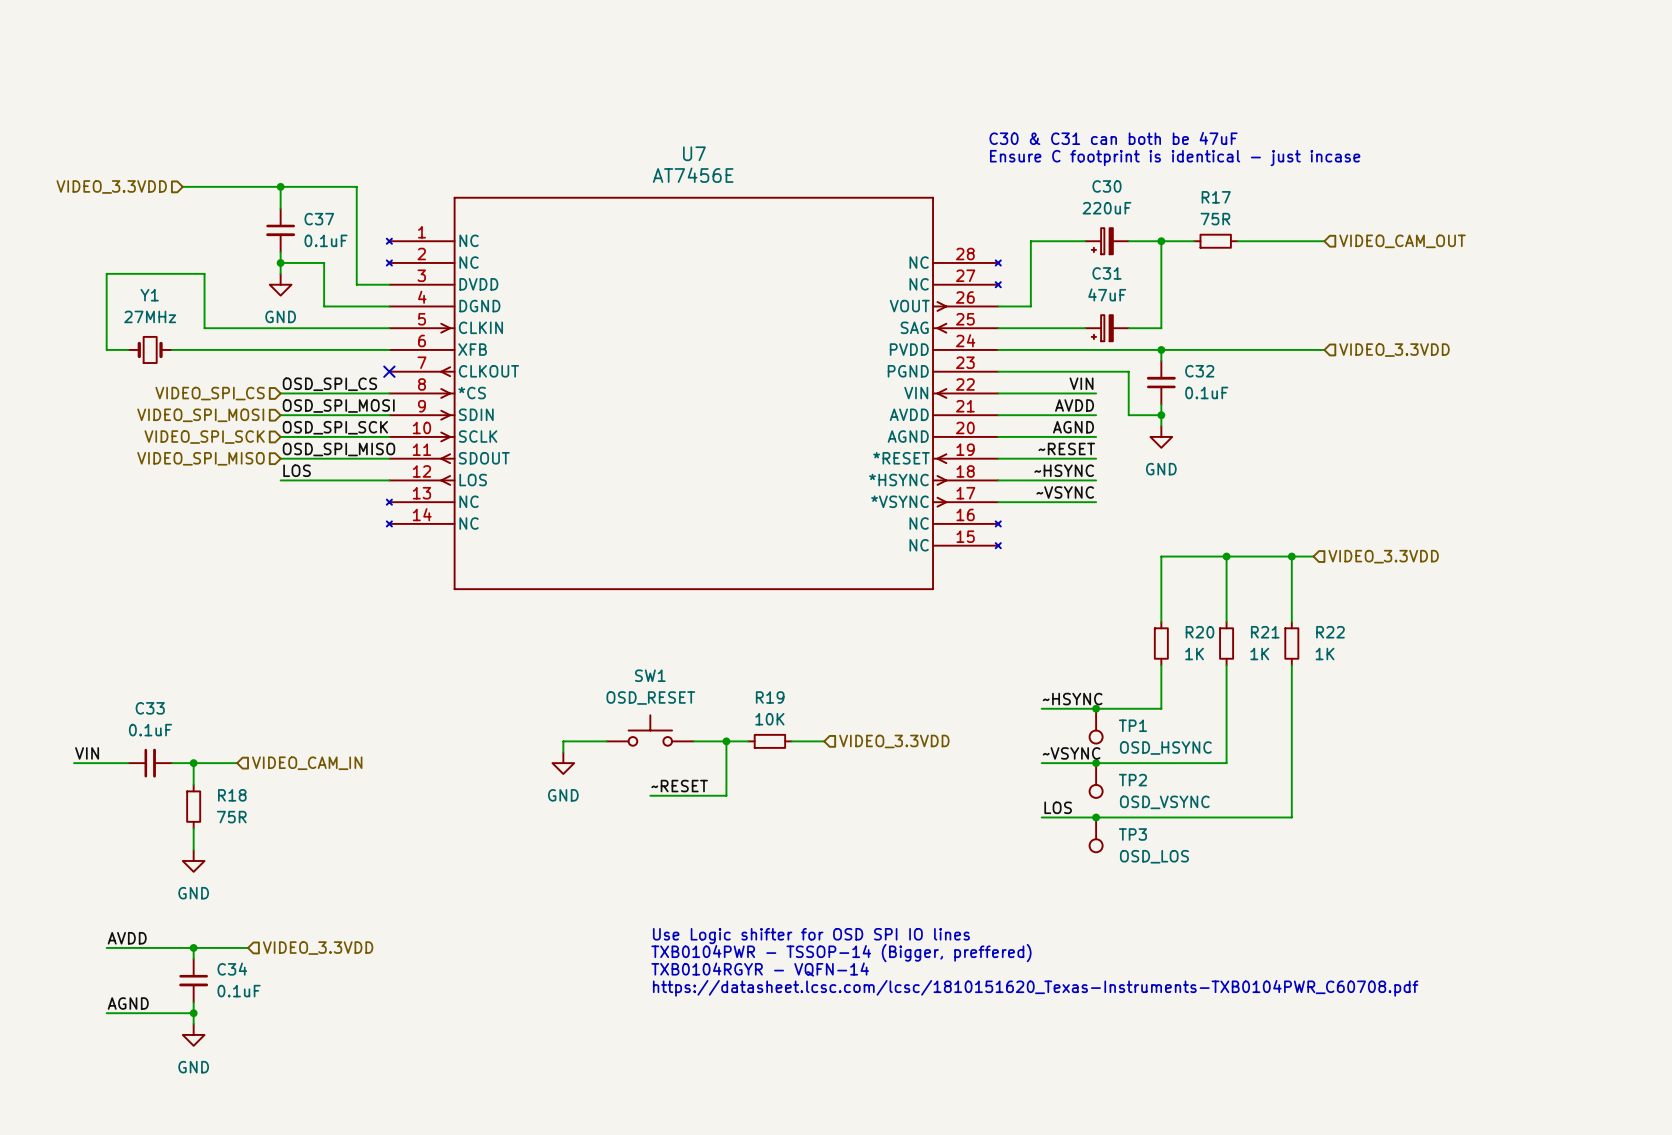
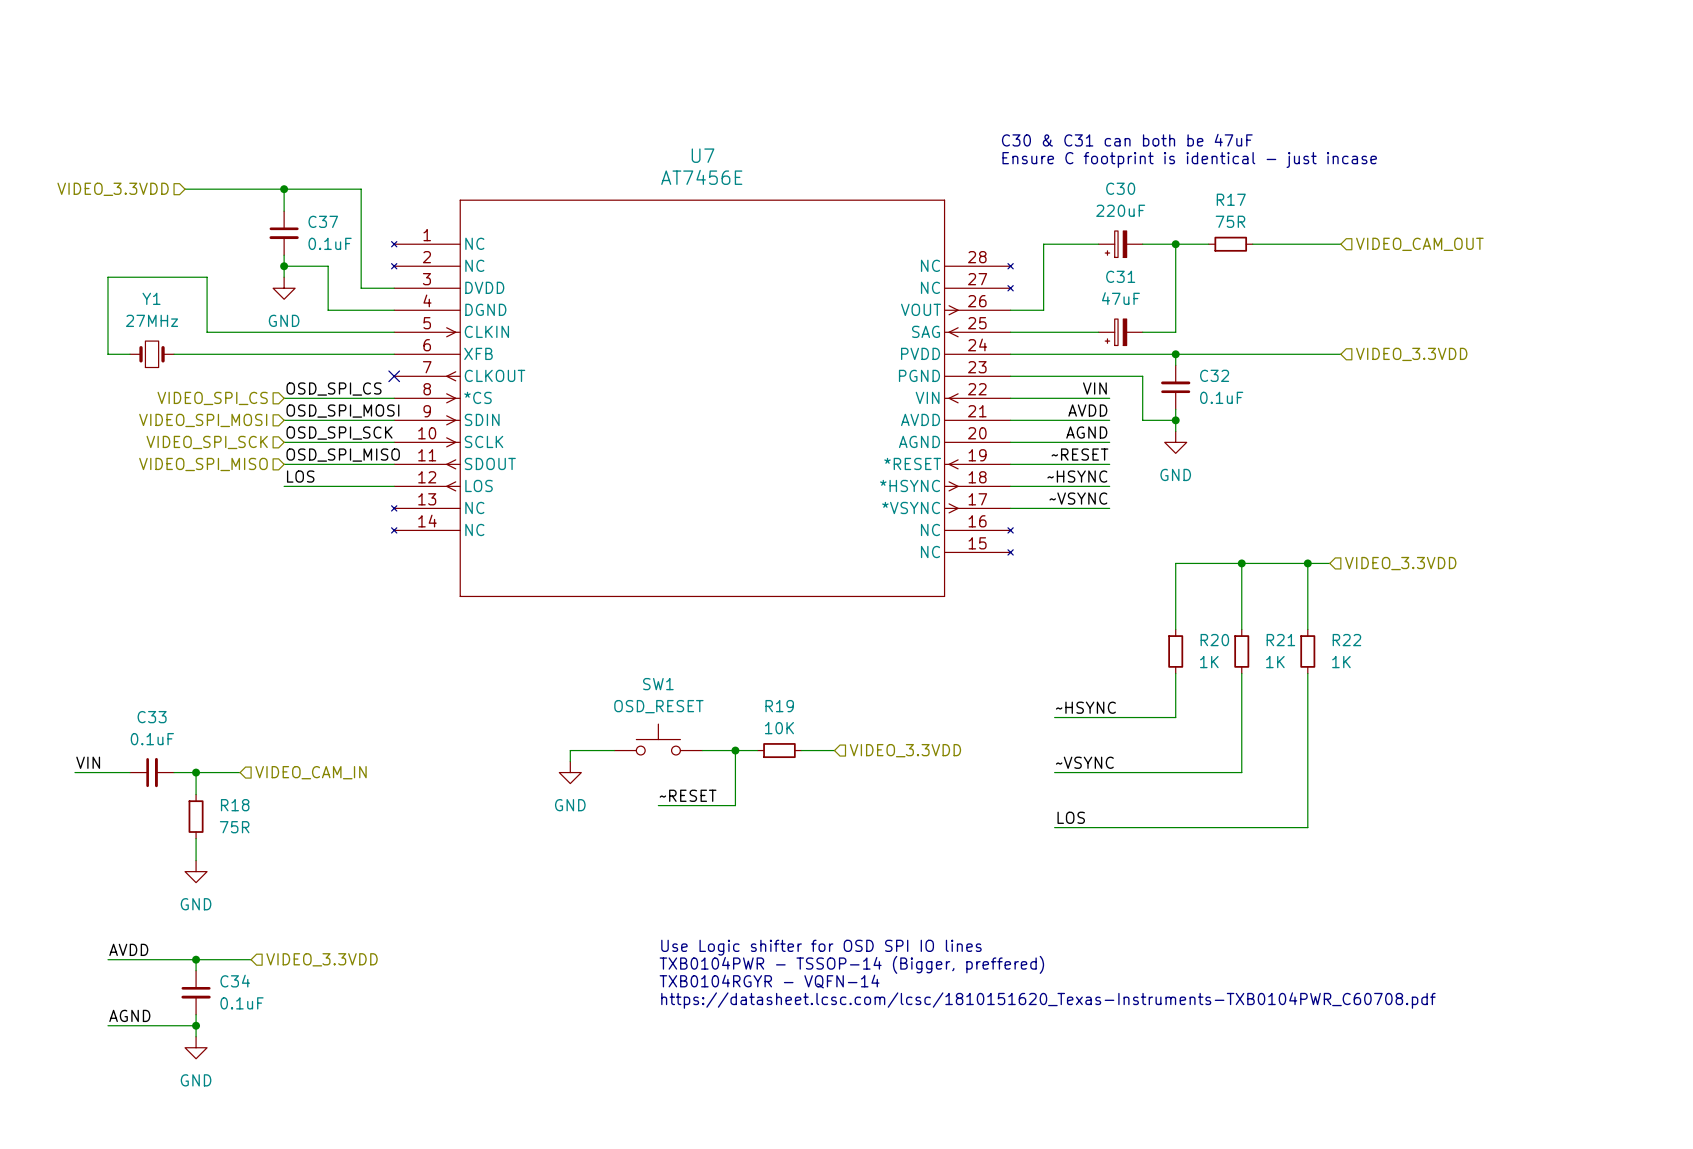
junction: (1096, 708) -> none
TP1: OSD_HSYNC (1096, 726) -> none
junction: (1096, 763) -> none
TP2: OSD_VSYNC (1096, 780) -> none
junction: (1096, 817) -> none
TP3: OSD_LOS (1096, 834) -> none

